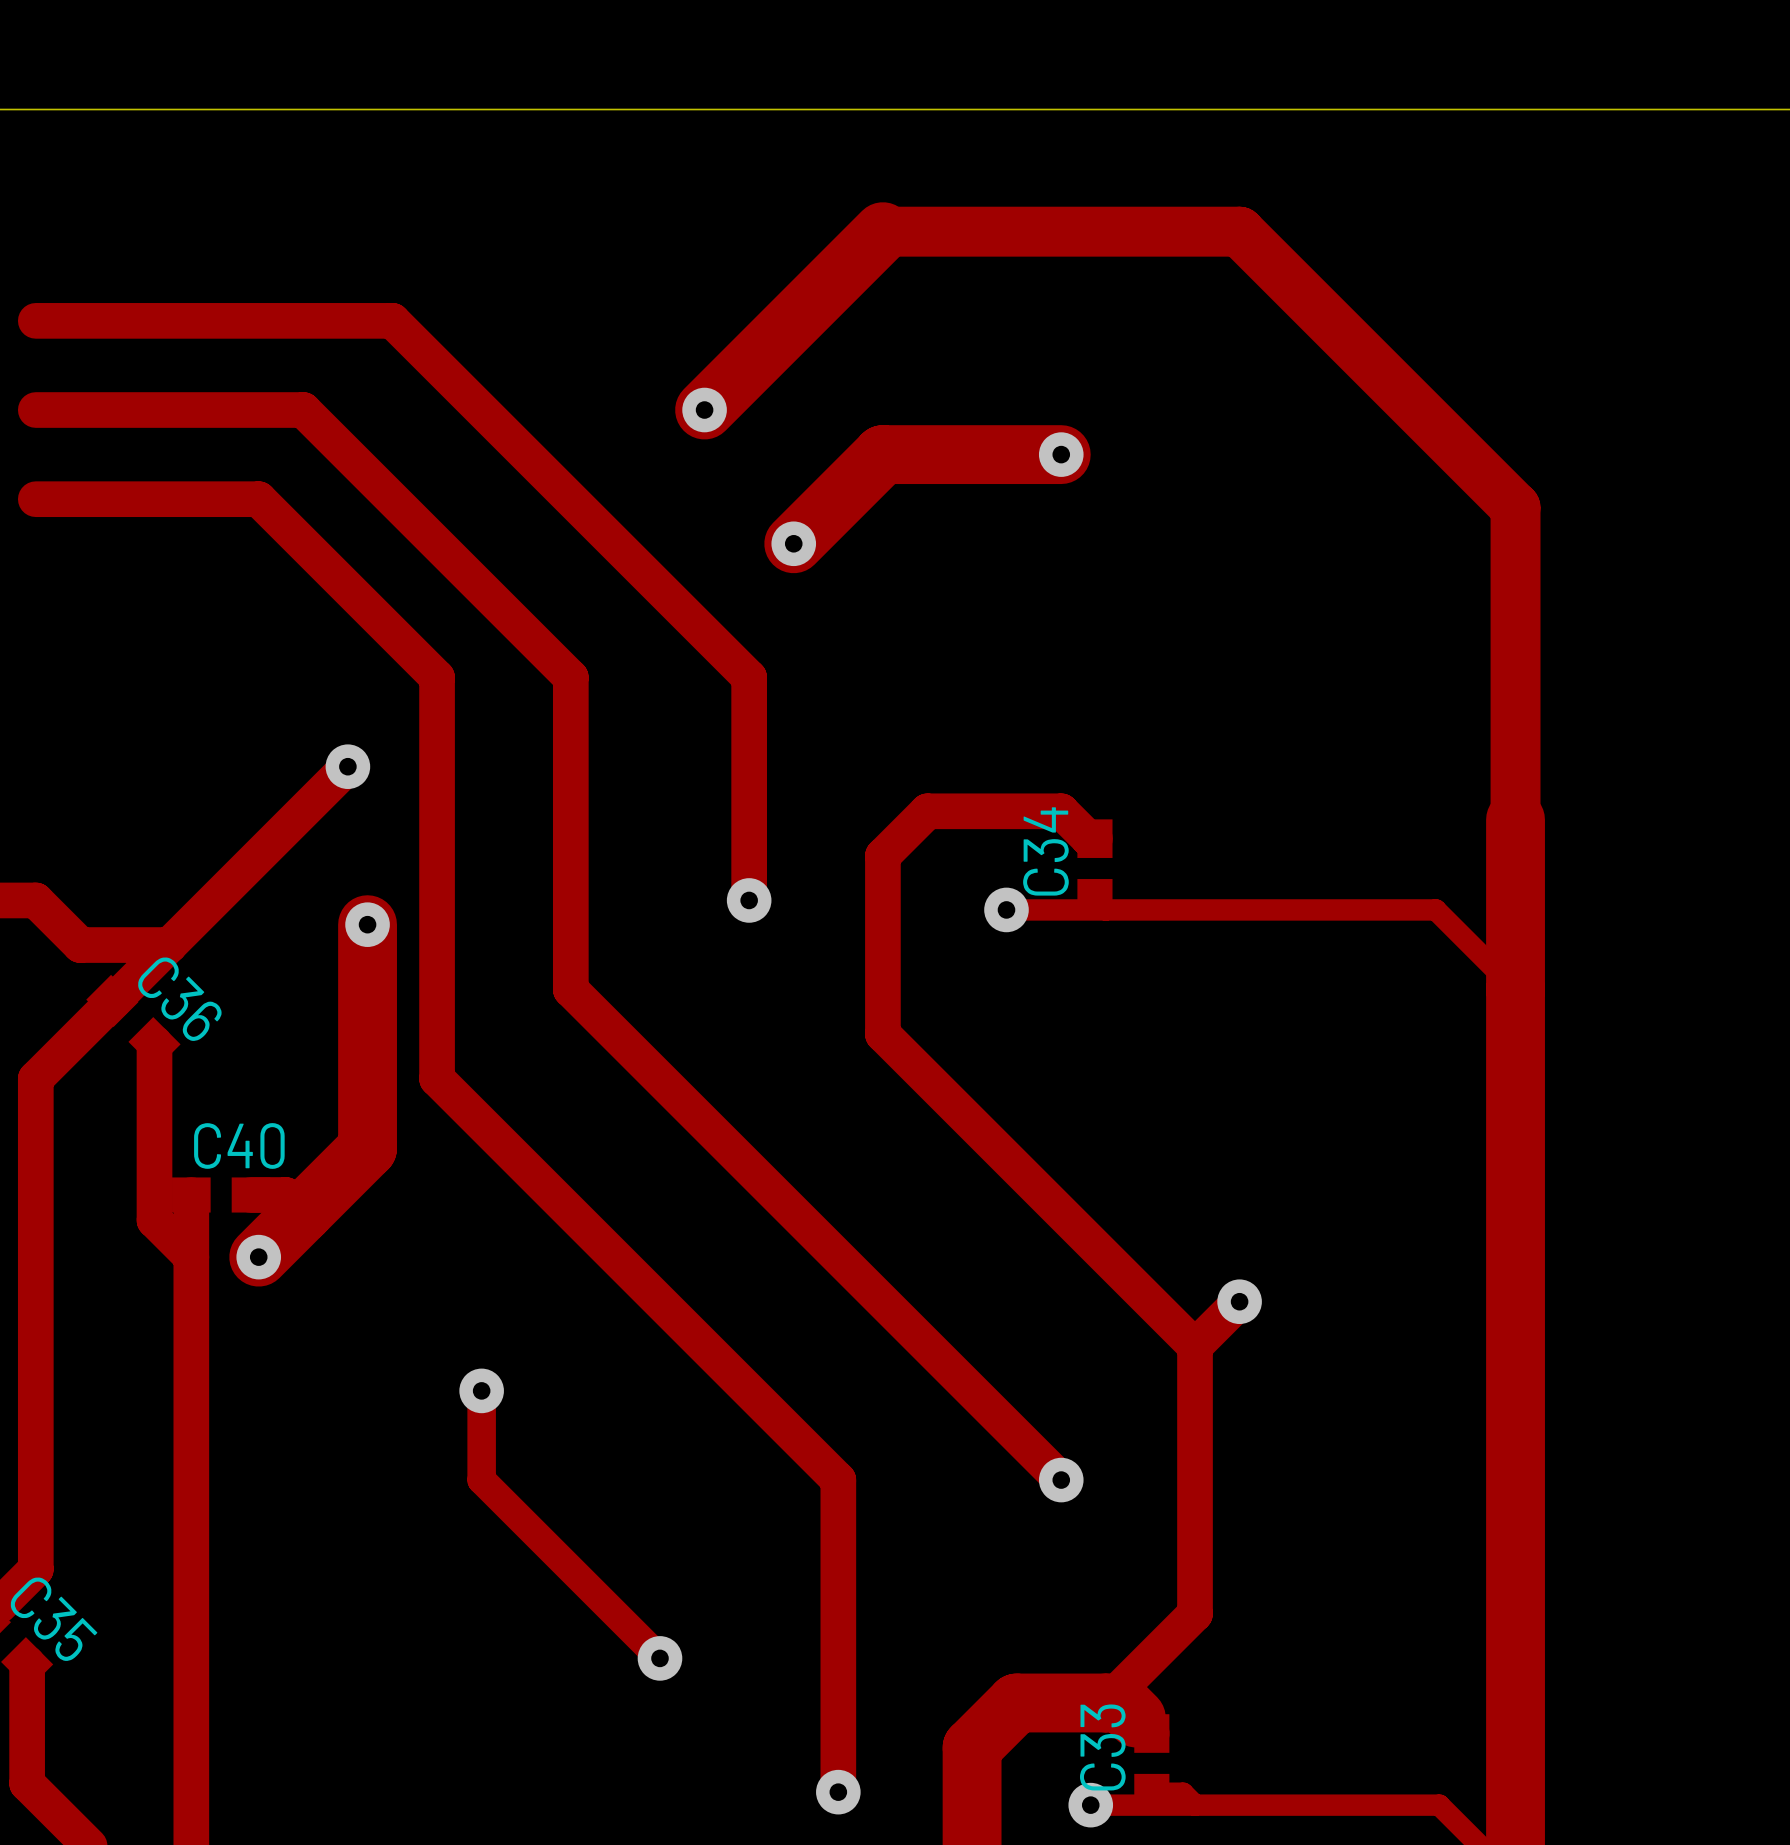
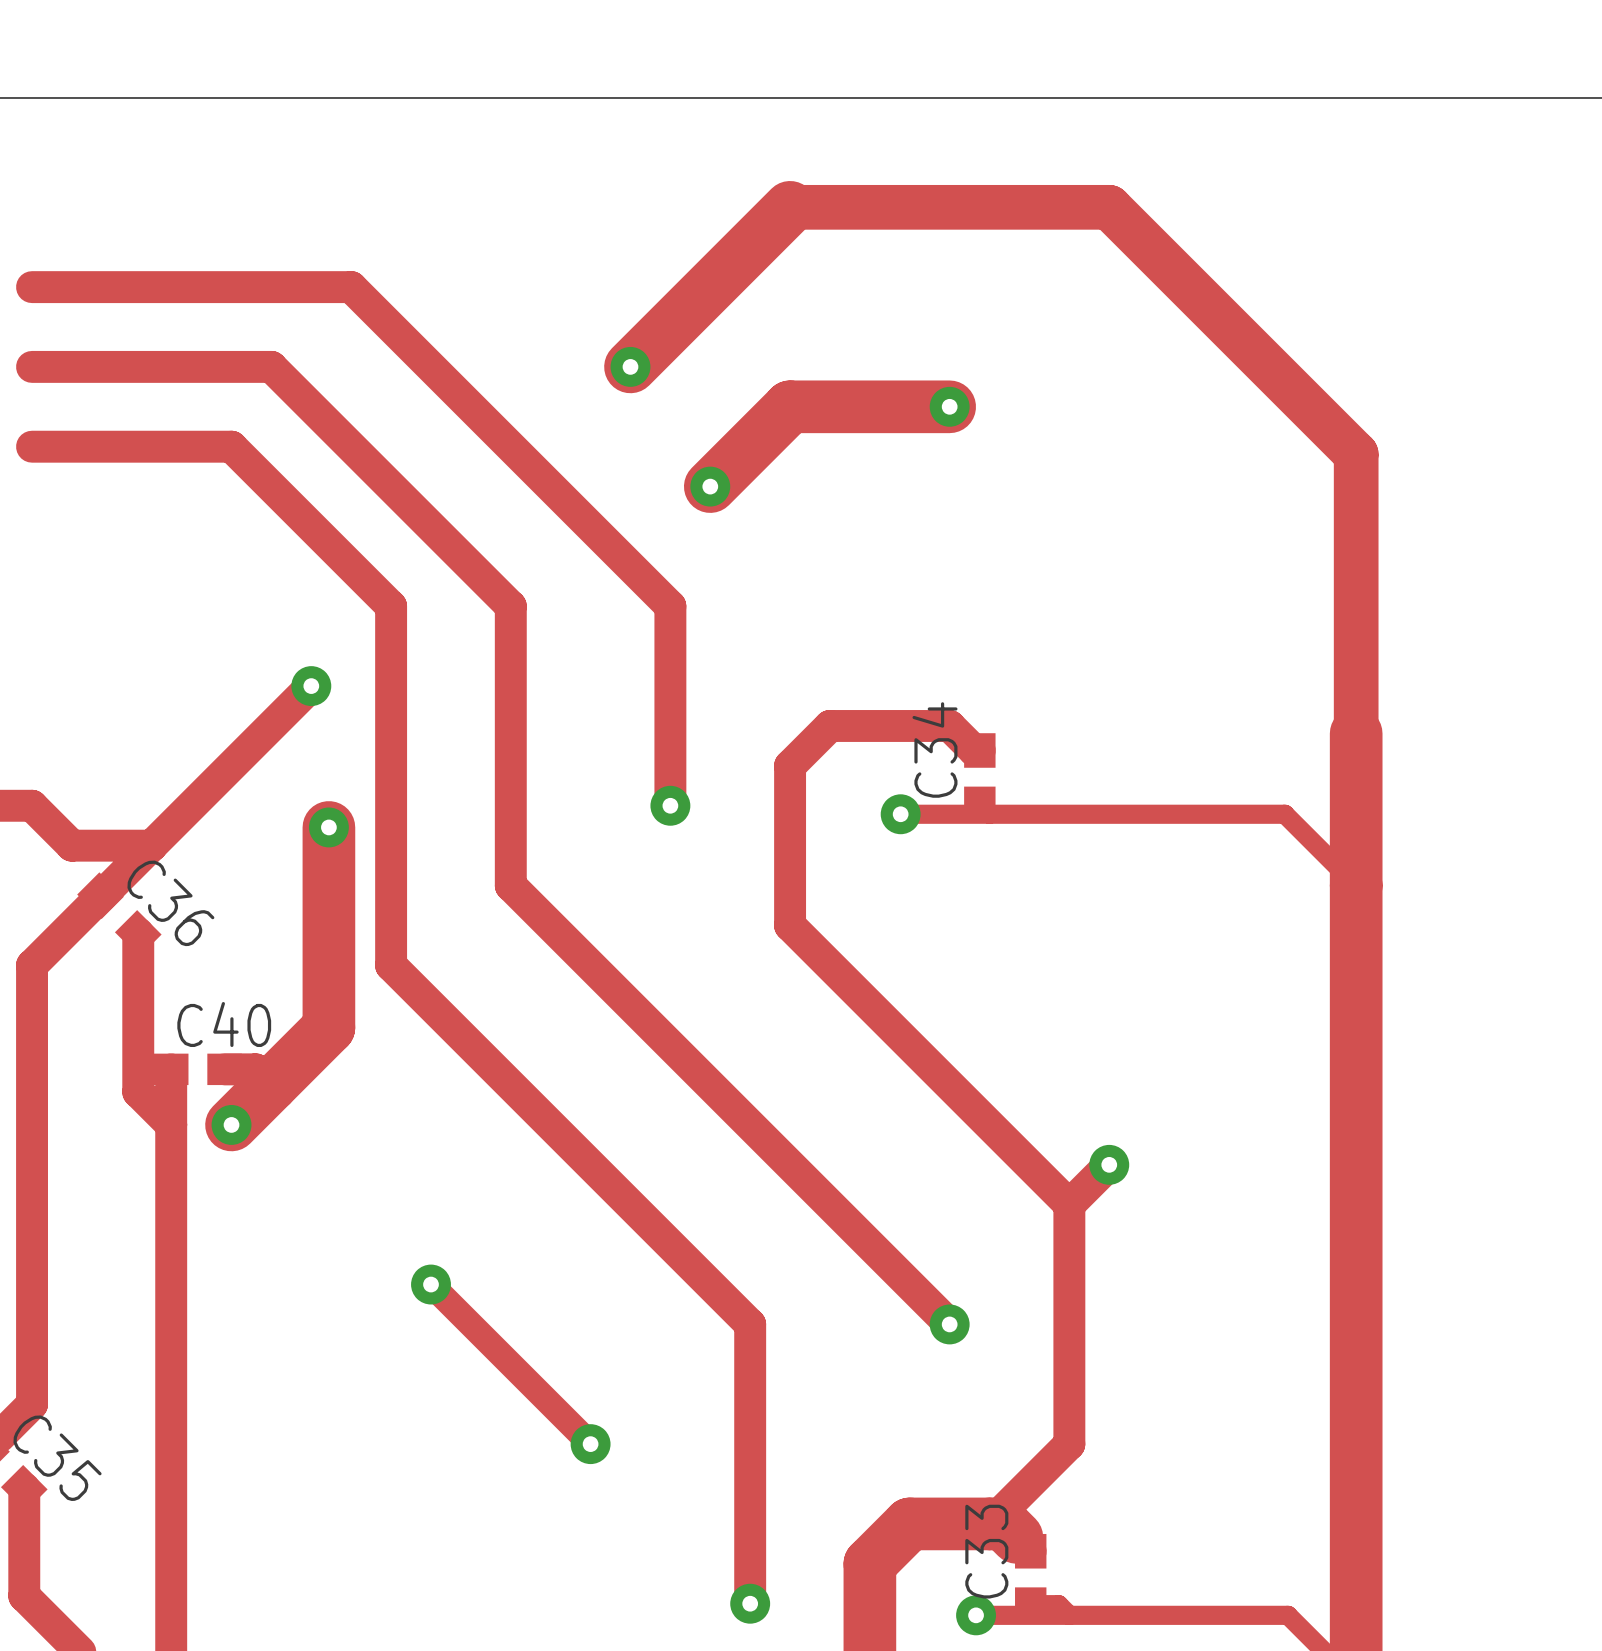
track: (481, 1390) (481, 1480) (659, 1658) -> none
via position: (481, 1390) -> (431, 1284)
track: none -> (431, 1284) (590, 1444)
via position: (659, 1658) -> (590, 1444)

